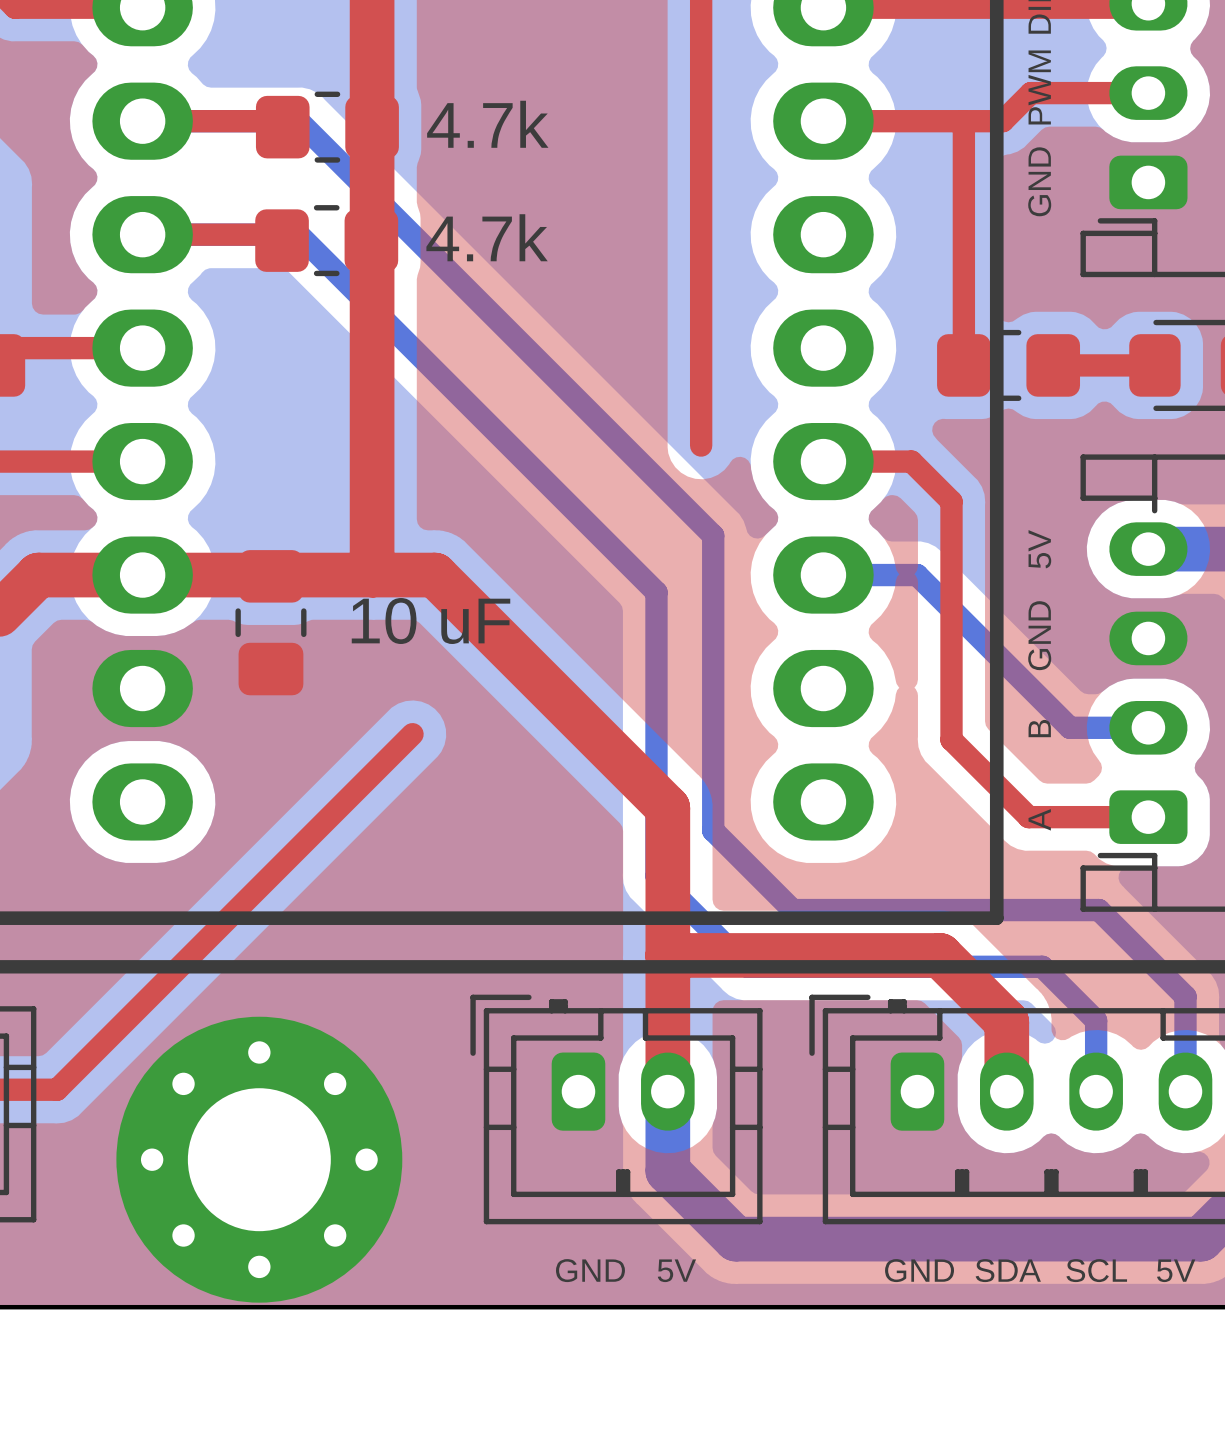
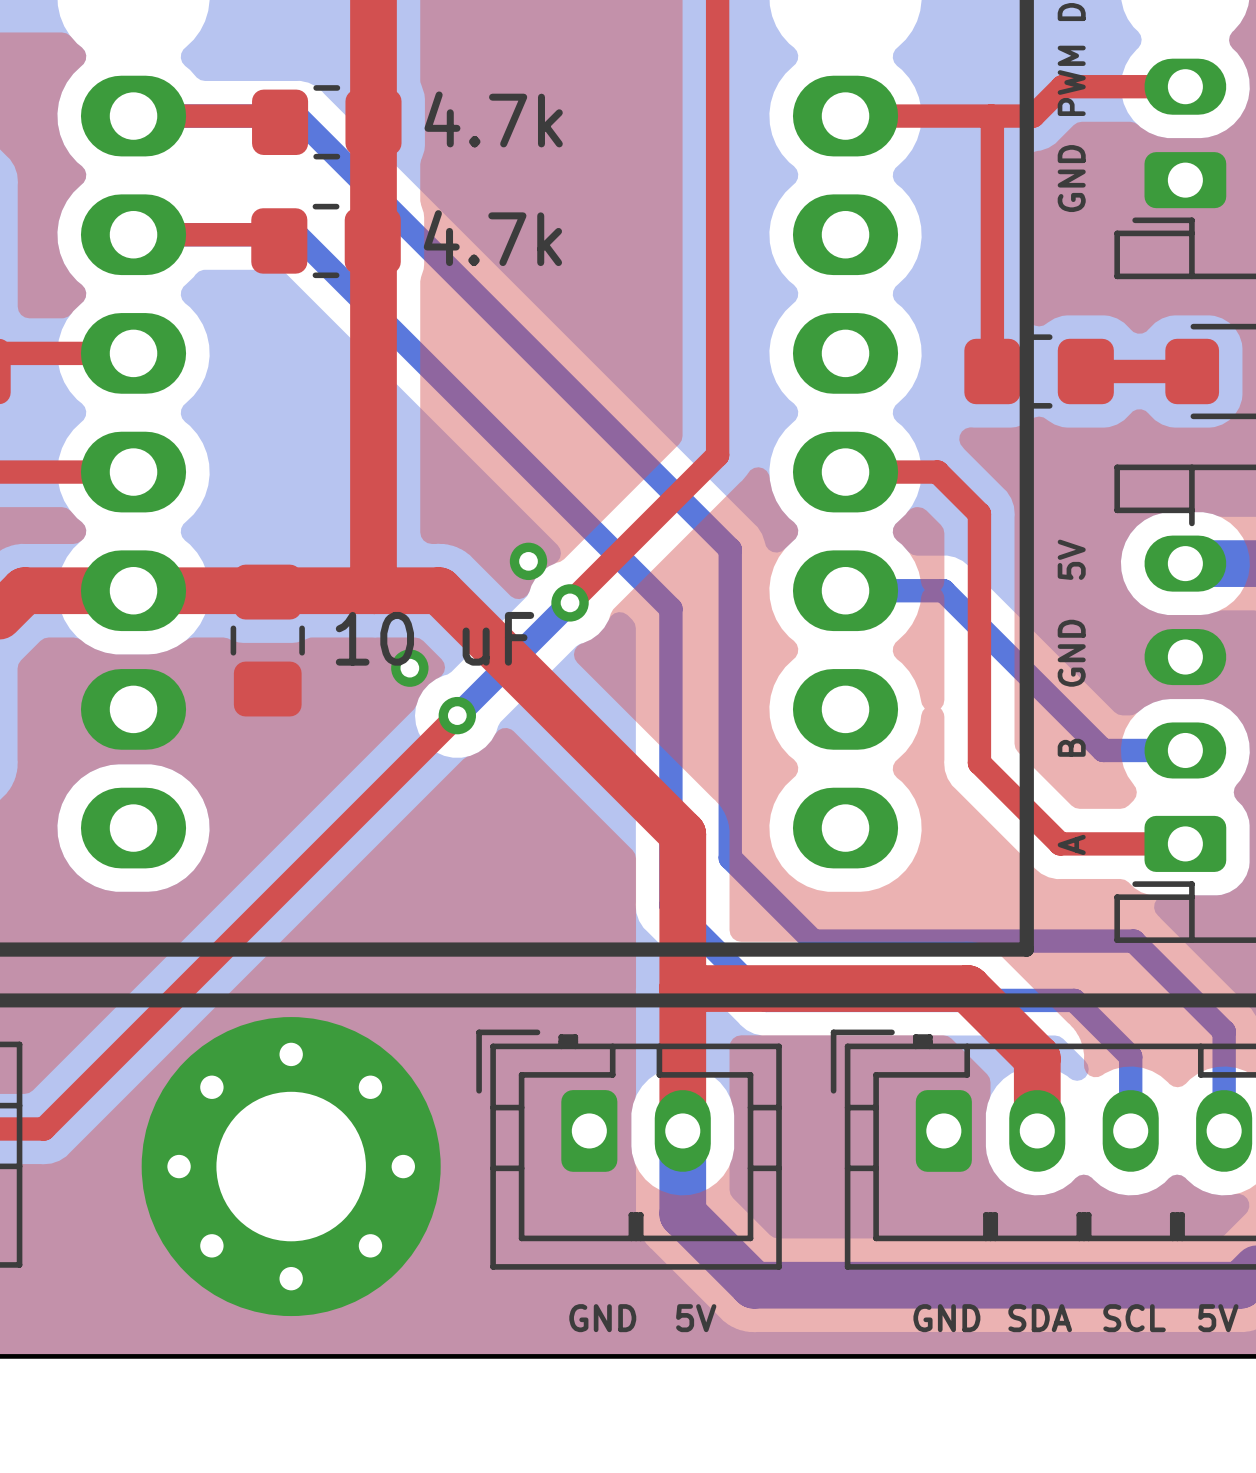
top track: none -> (717, 455) (570, 602)
via: none -> (528, 561)
bottom track: none -> (570, 602) (457, 715)
via: none -> (570, 602)
via: none -> (409, 668)
top track: none -> (457, 715) (415, 757)
via: none -> (457, 715)
part position: (259, 1159) -> (291, 1166)

